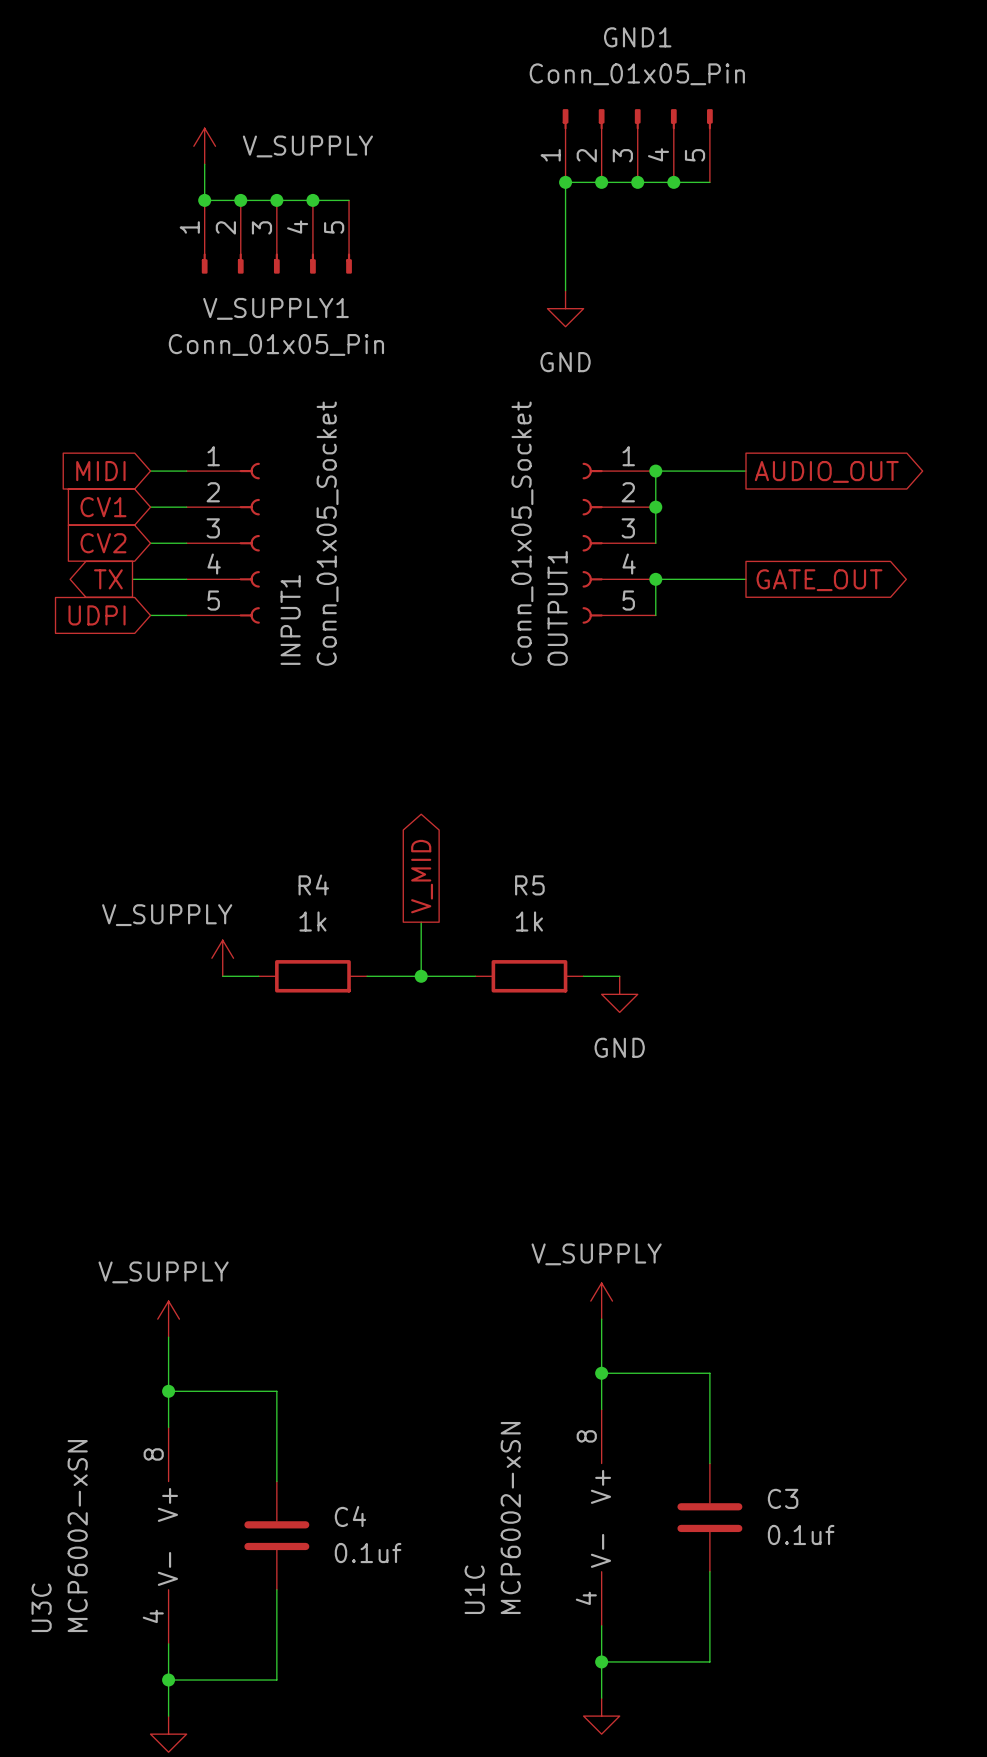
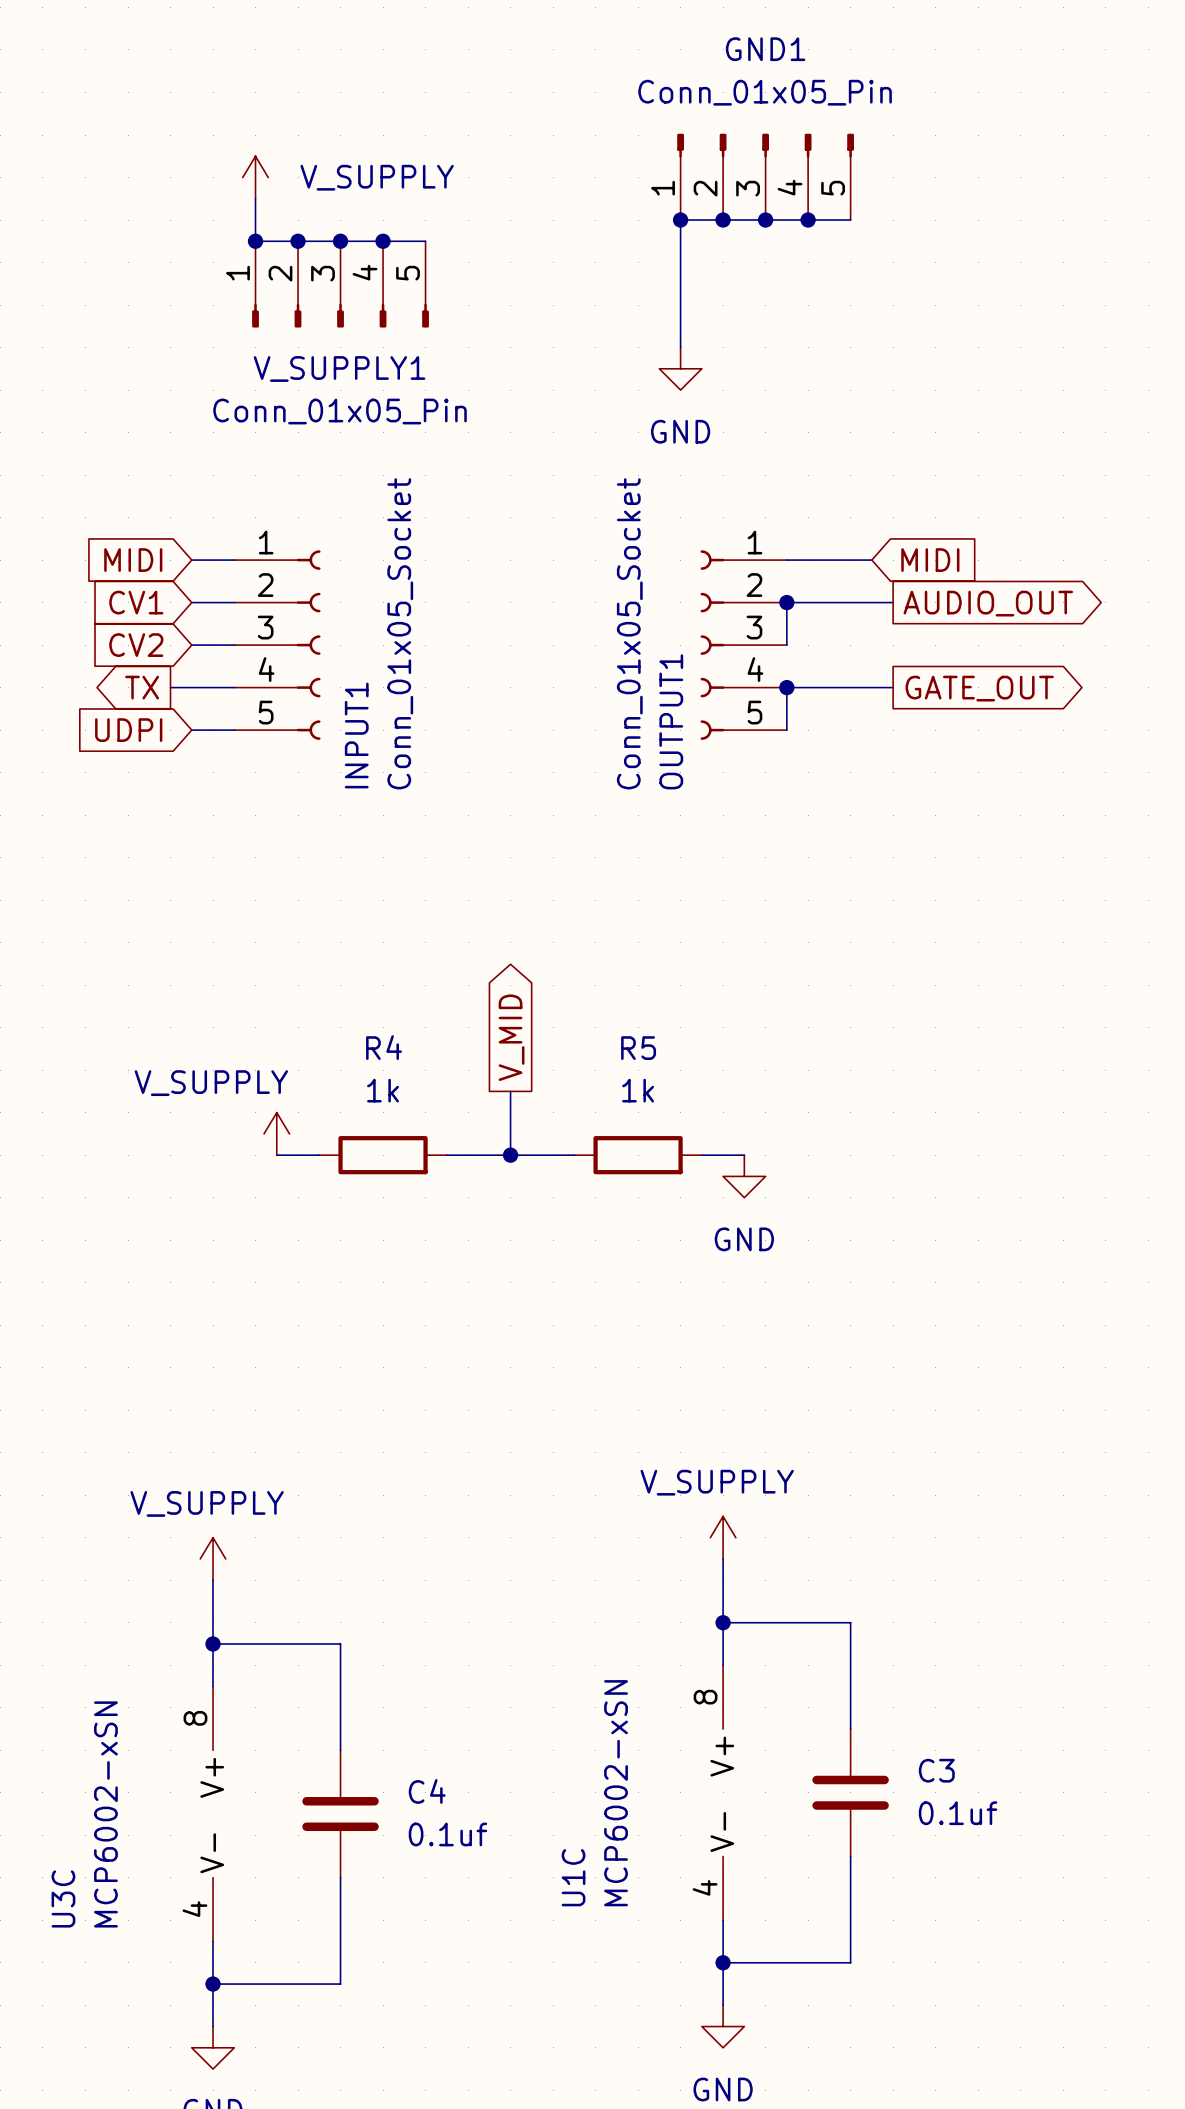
wire: (655, 471) (655, 507) -> (893, 602) (786, 602)
junction: (655, 471) -> none
wire: (727, 471) (745, 471) -> none
global label: none -> MIDI (930, 560)
global label position: AUDIO_OUT (826, 471) -> AUDIO_OUT (988, 603)

